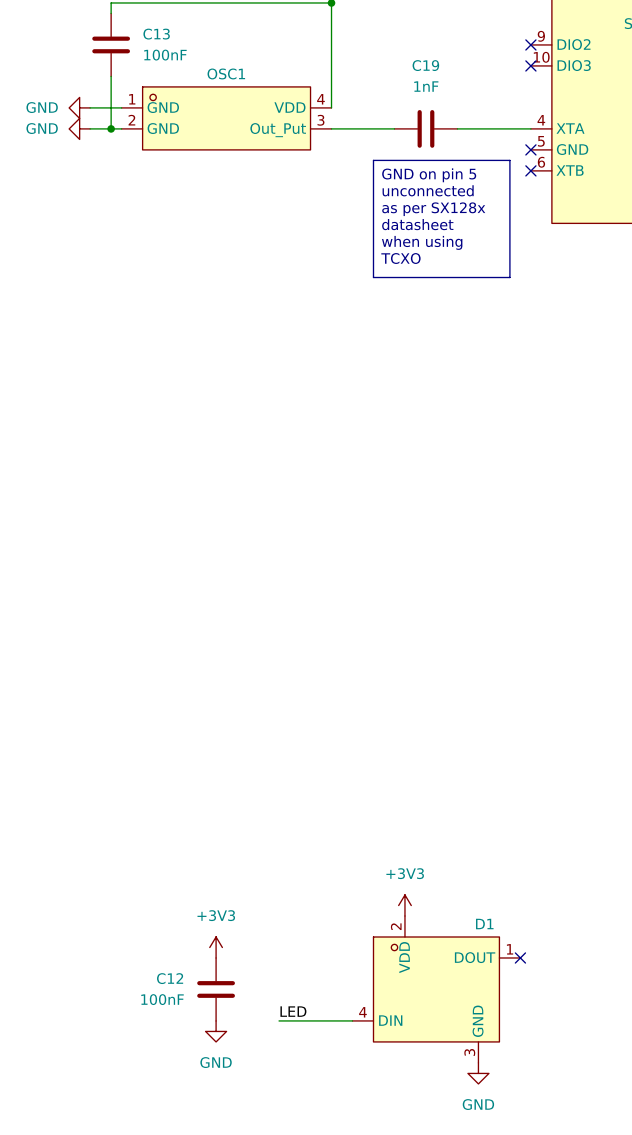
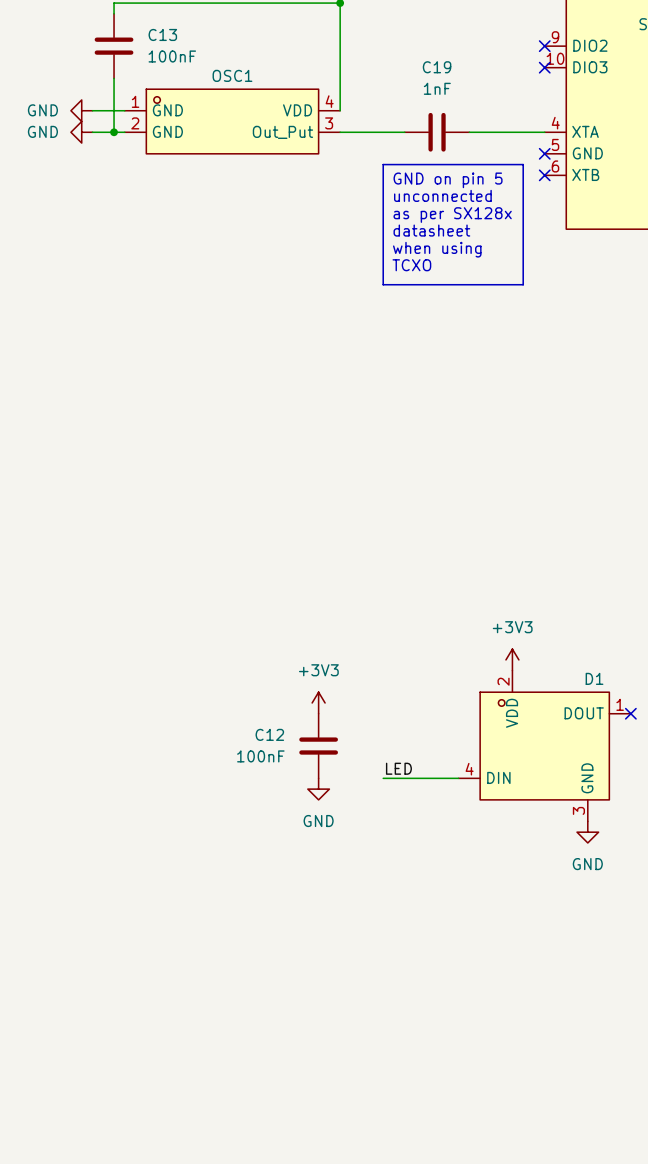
power symbol: none -> +3V3 (512, 659)
power symbol: none -> +3V3 (318, 702)
no-connect mark: none -> (630, 713)
label: none -> LED (398, 768)
wire: none -> (383, 778) (458, 778)
power symbol: none -> GND (318, 789)
power symbol: none -> GND (587, 832)
power symbol: +3V3 (404, 905) -> none
power symbol: +3V3 (216, 947) -> none
no-connect mark: (520, 957) -> none
C12 position: (216, 989) -> (318, 746)
D1 position: (436, 989) -> (544, 746)
label: LED (293, 1011) -> none
wire: (279, 1020) (352, 1020) -> none
power symbol: GND (216, 1031) -> none
power symbol: GND (478, 1073) -> none

